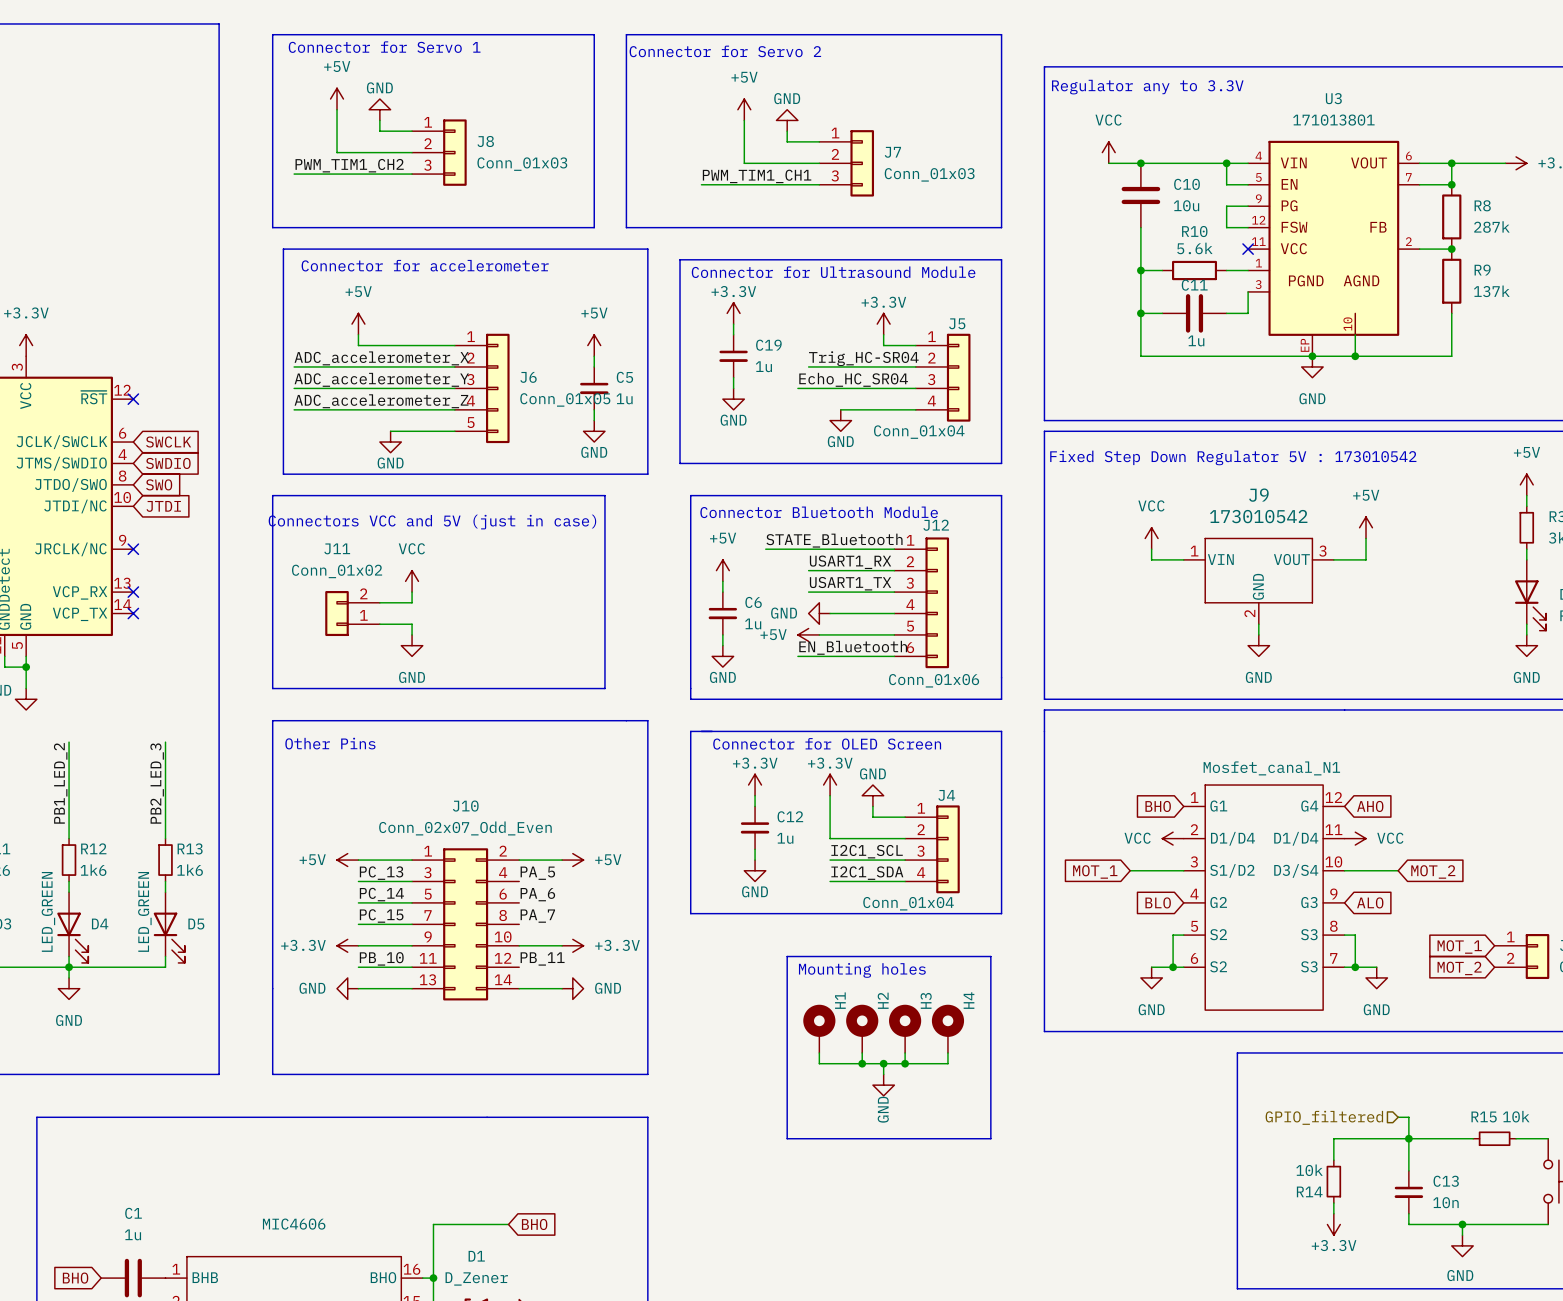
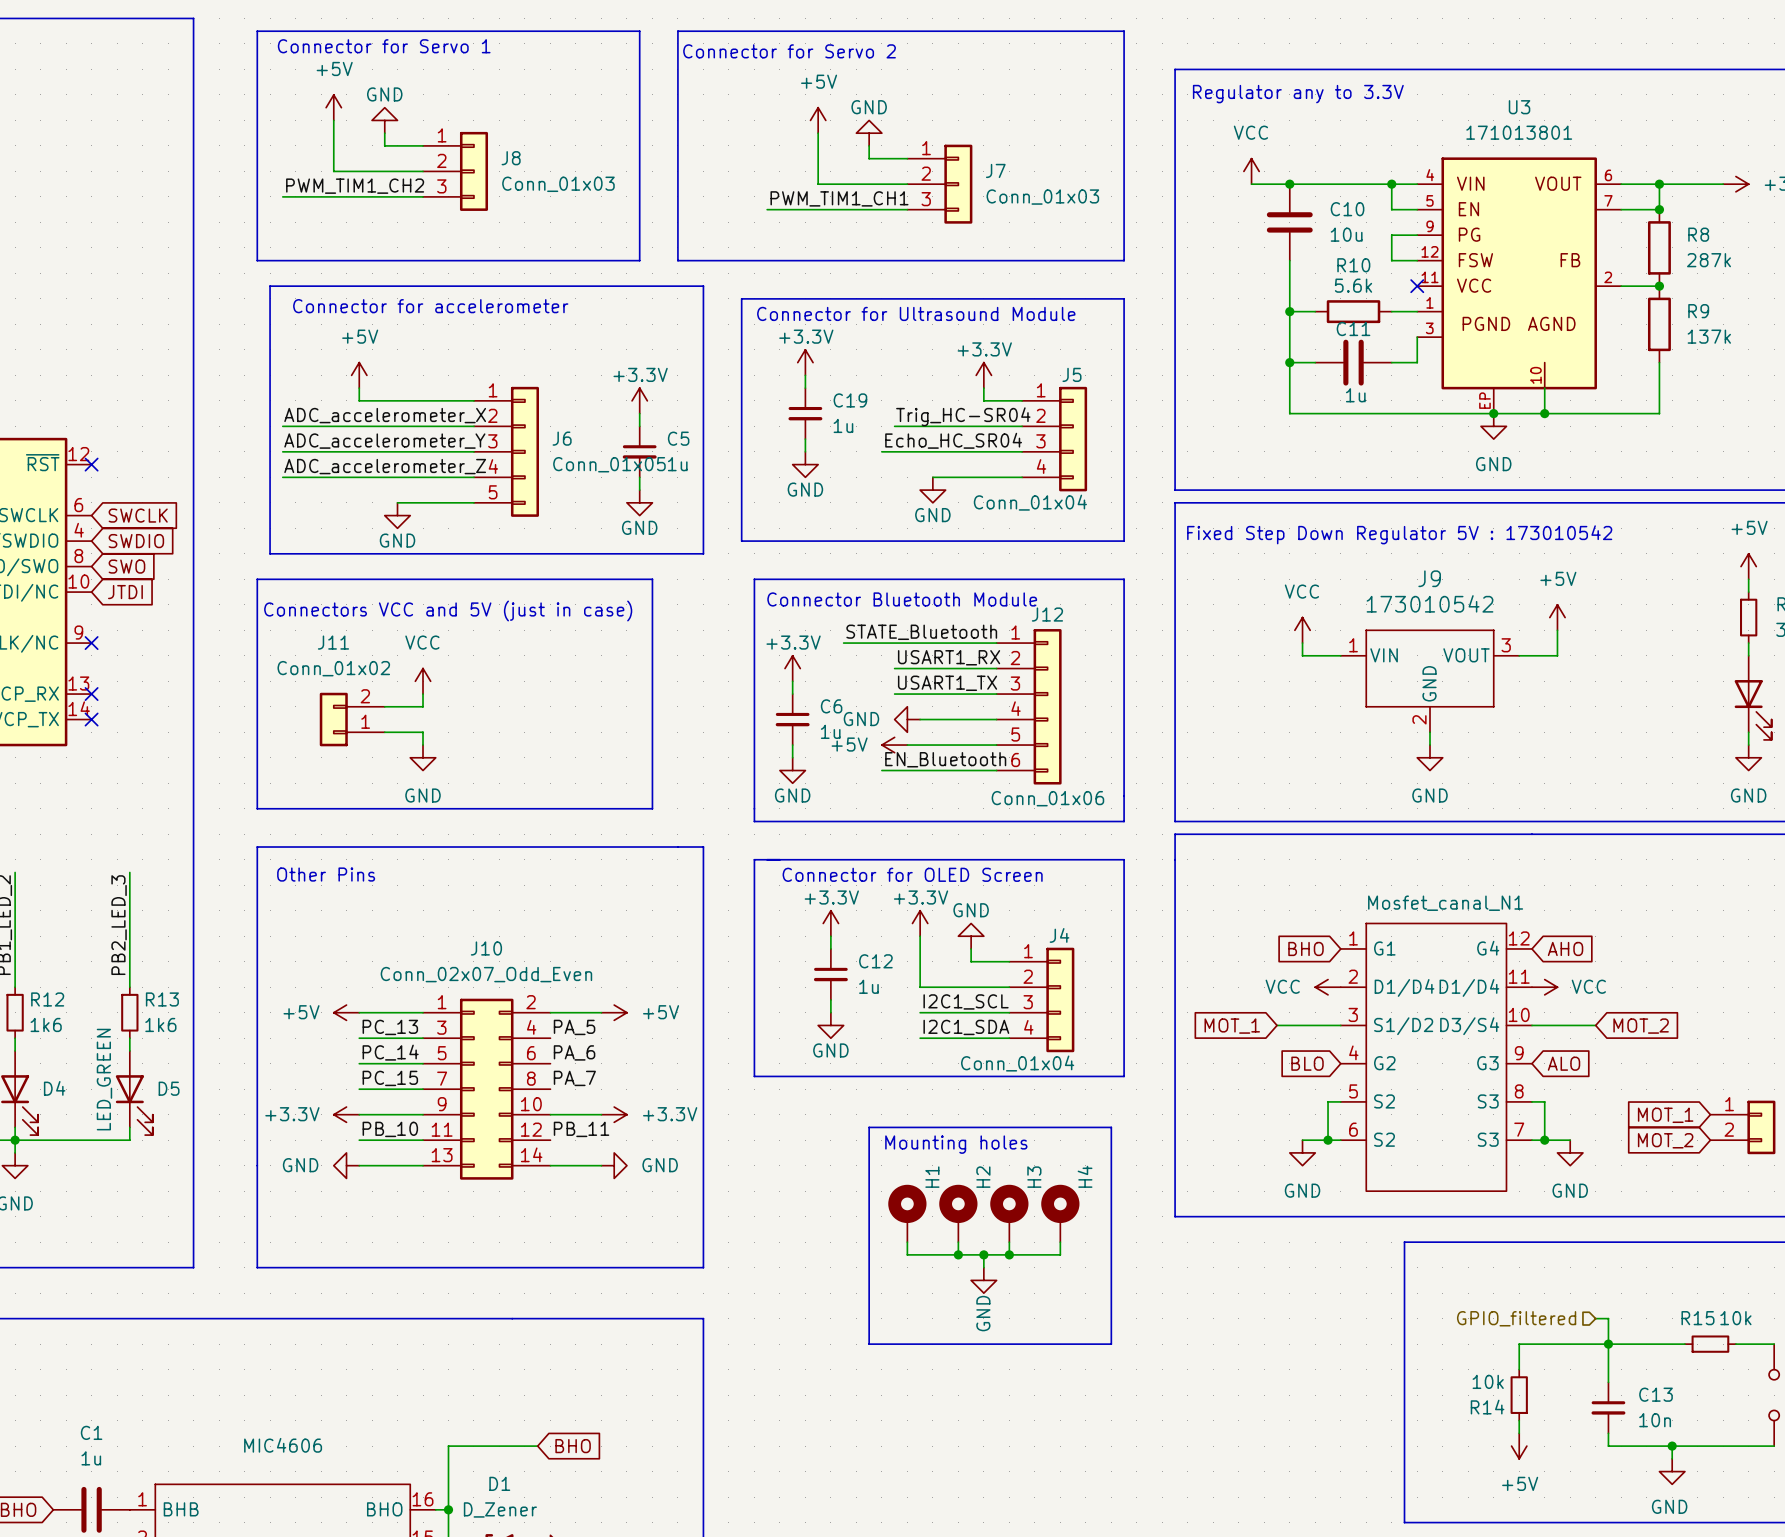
power symbol: +5V (594, 345) -> +3.3V (639, 400)
power symbol: +5V (722, 570) -> +3.3V (792, 668)
power symbol: +3.3V (1333, 1224) -> +5V (1519, 1446)

